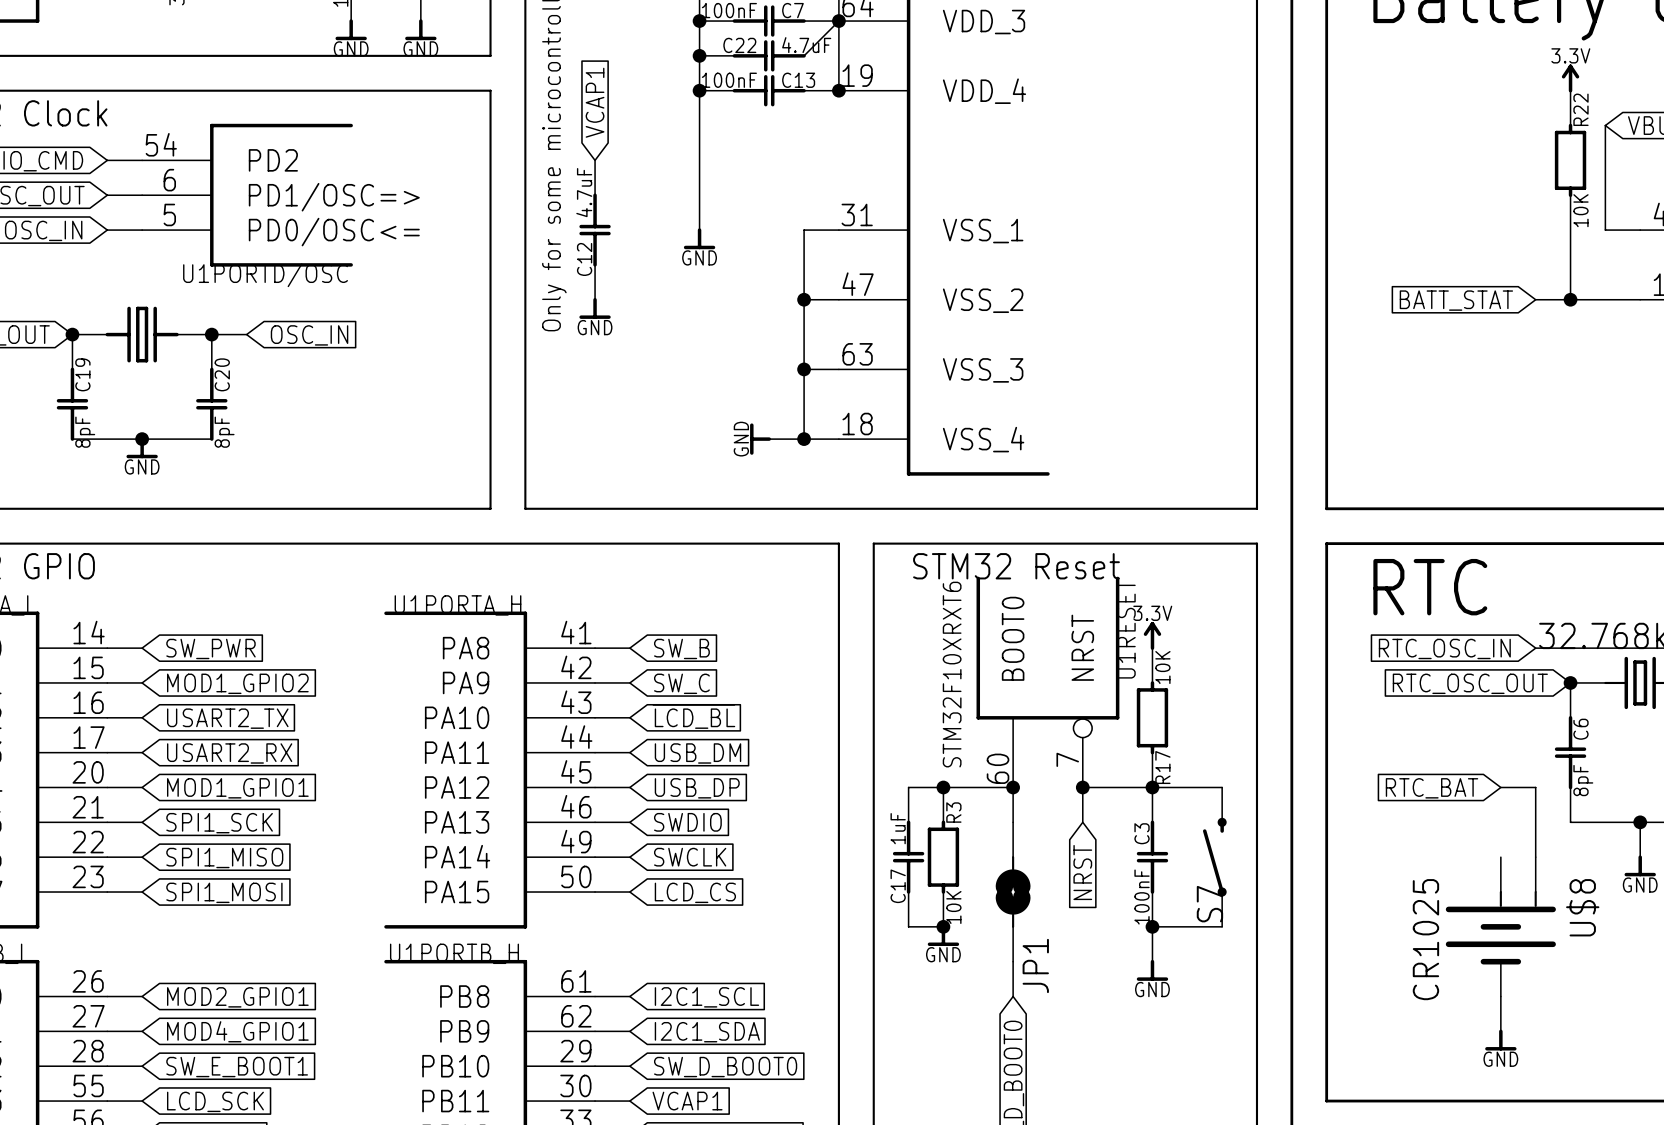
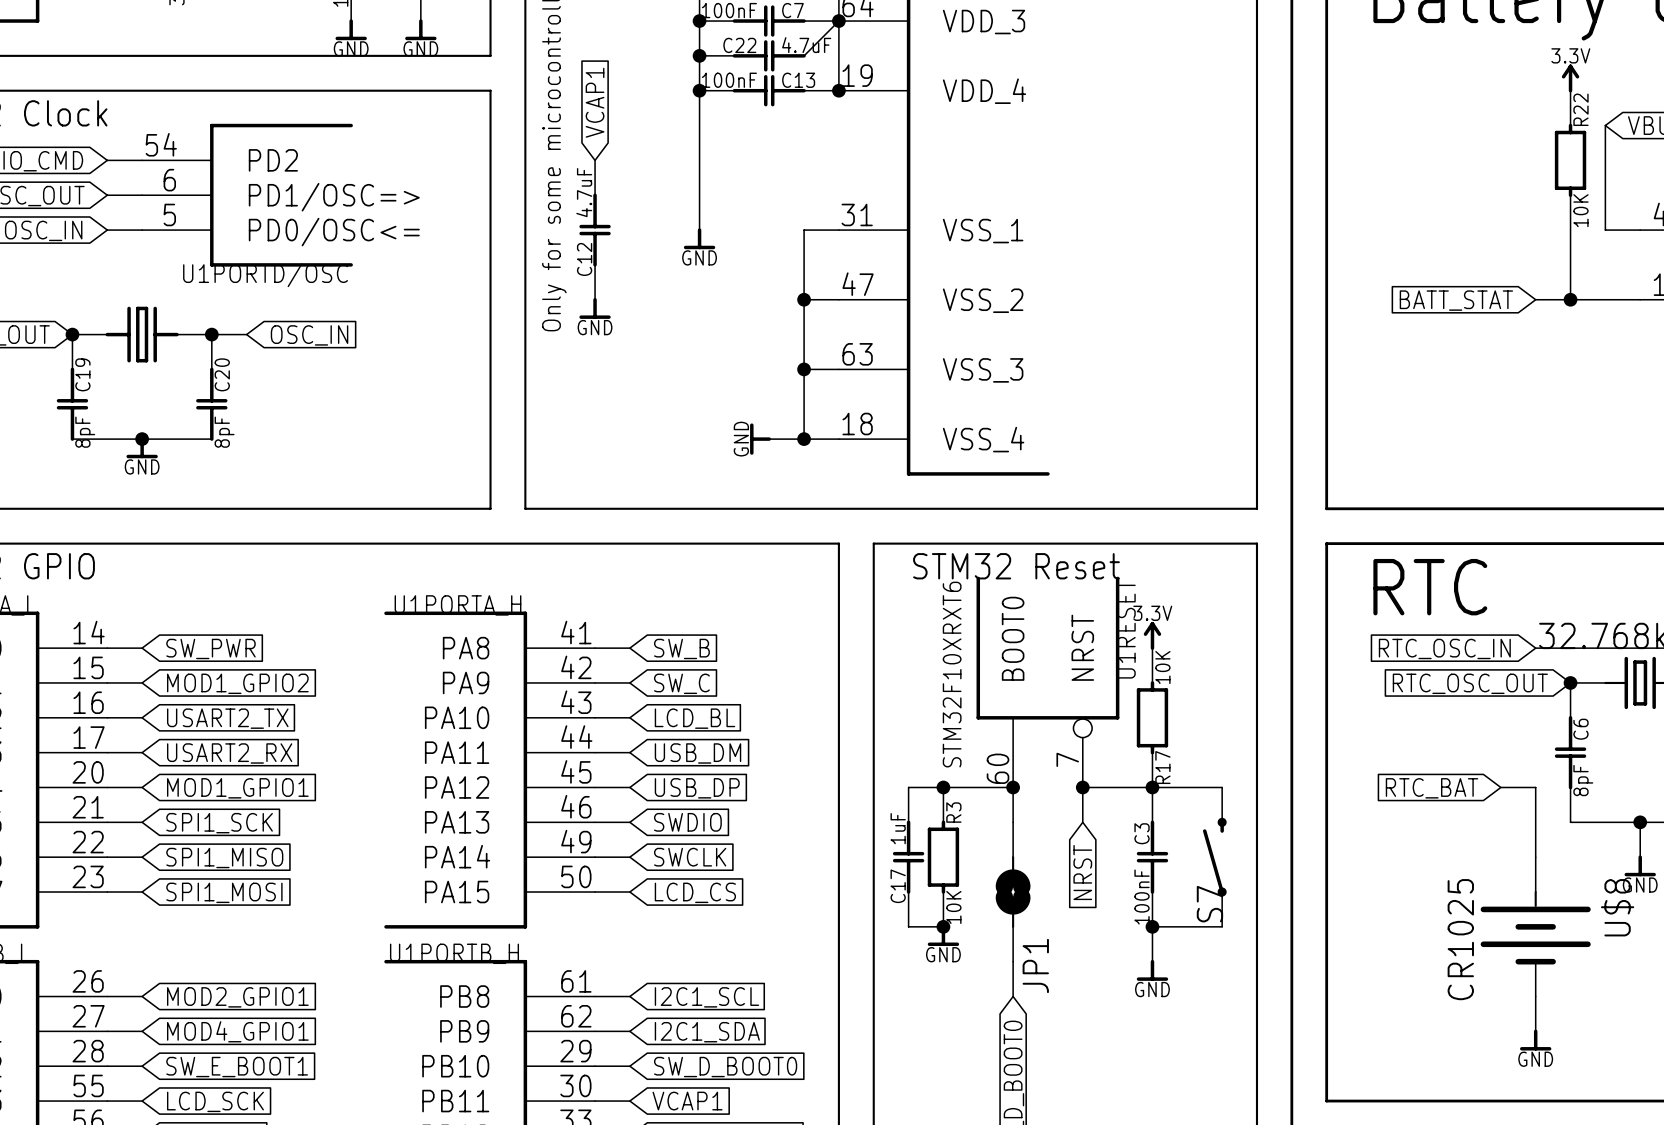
global label: ~{LCD_BL} (693, 716) -> LCD_BL (695, 718)
U$8 symbol: [1445, 857, 1556, 997] -> [1480, 857, 1591, 997]
wire: (1500, 996) (1500, 1031) -> (1535, 996) (1535, 1031)
power symbol position: GND (1500, 1040) -> GND (1535, 1040)

